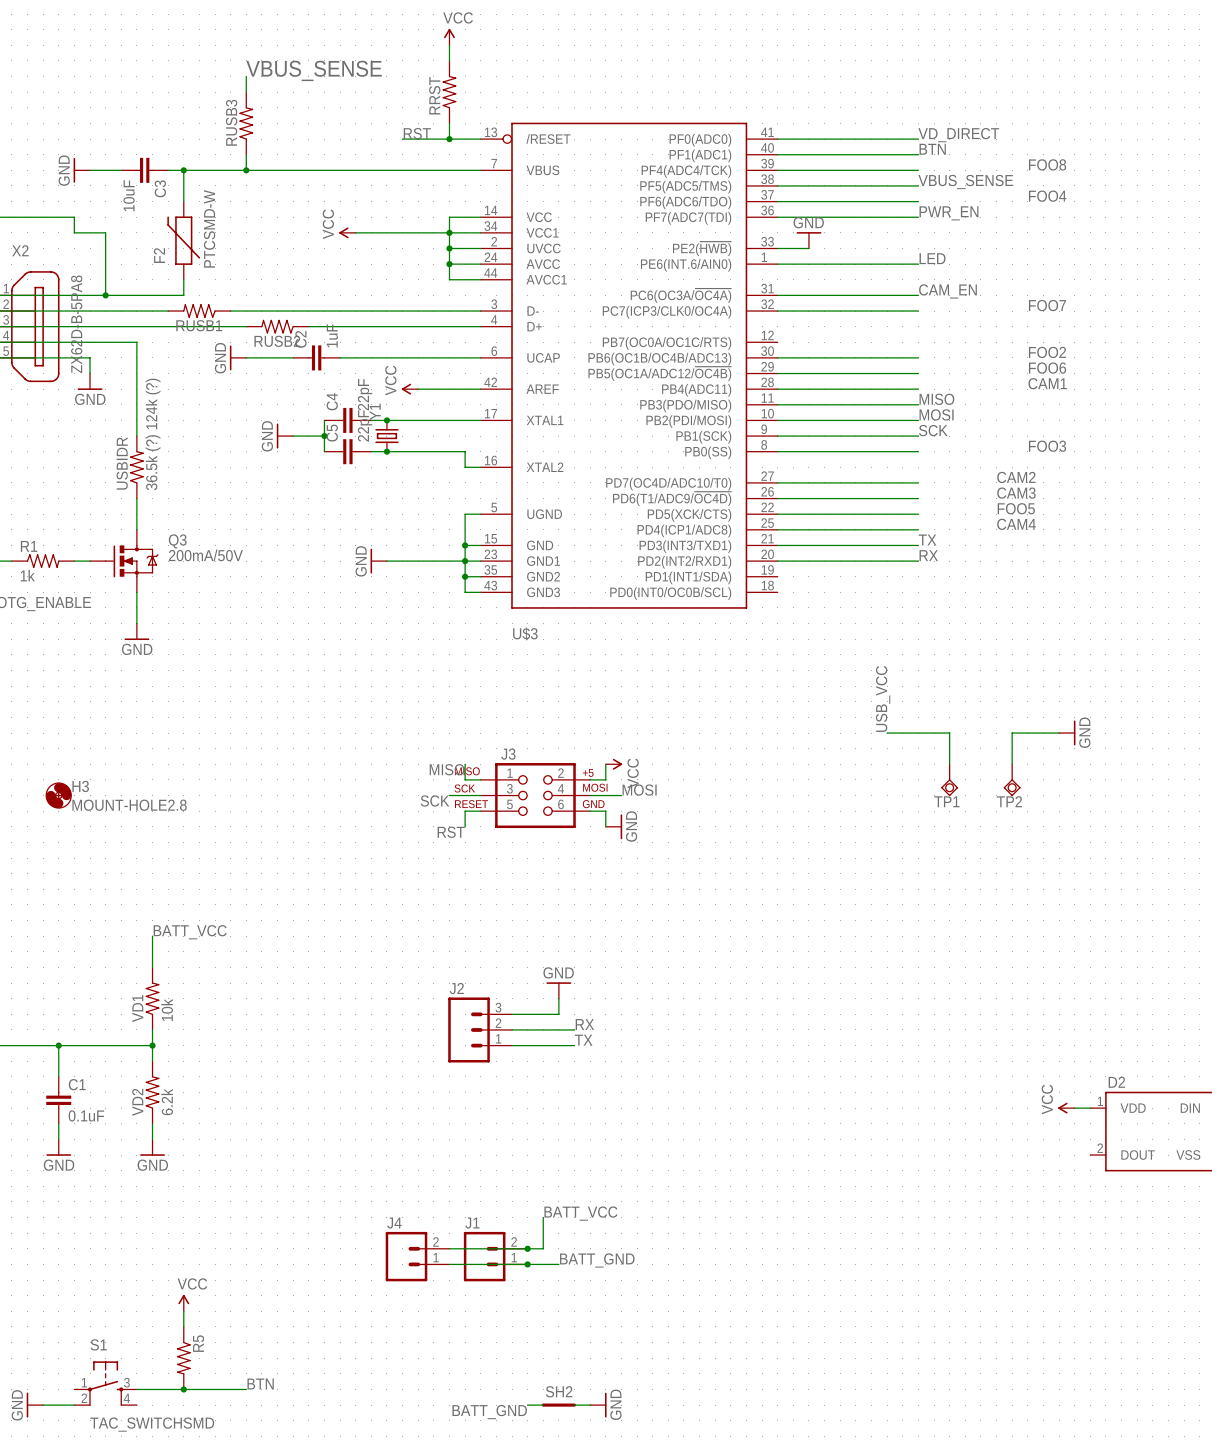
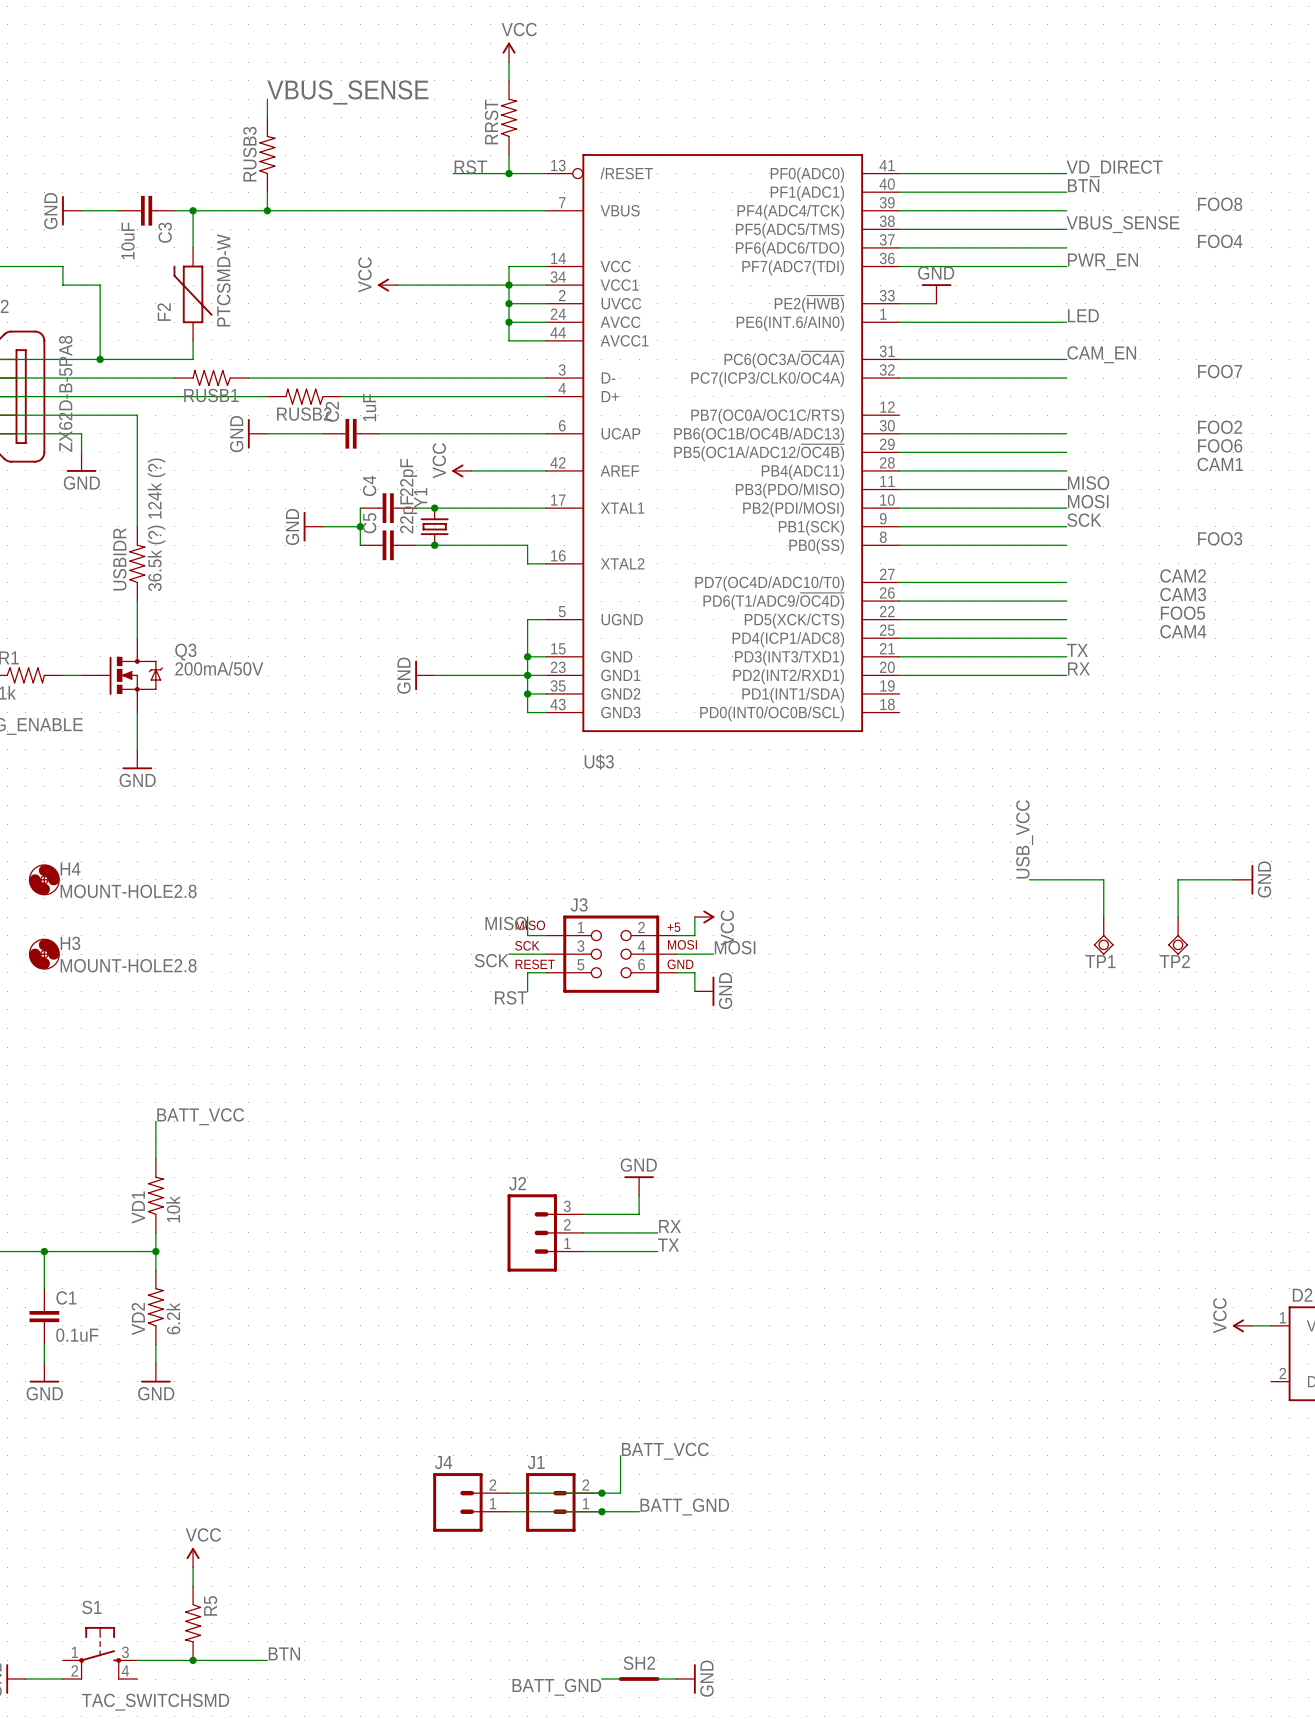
H4: none -> MOUNT-HOLE2.8 (44, 879)

